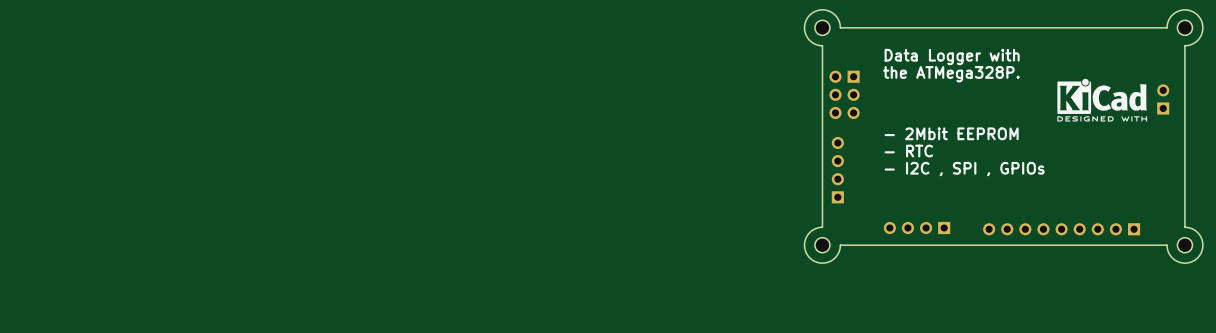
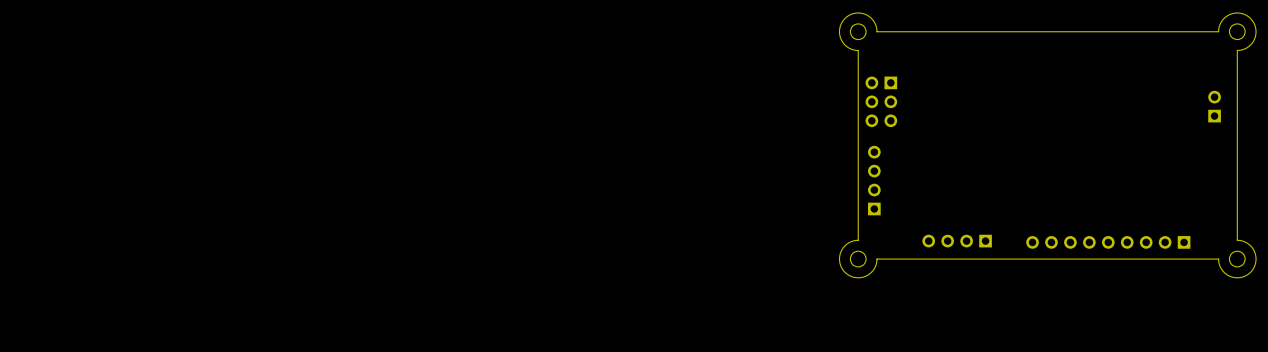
text: Data Logger with (952, 57) -> none
text: the ATMega328P. (951, 74) -> none
drawing: [1057, 78, 1148, 122] -> none
text: - 2Mbit EEPROM (951, 133) -> none
text: - RTC (908, 151) -> none
text: - I2C , SPI , GPIOs (964, 169) -> none

